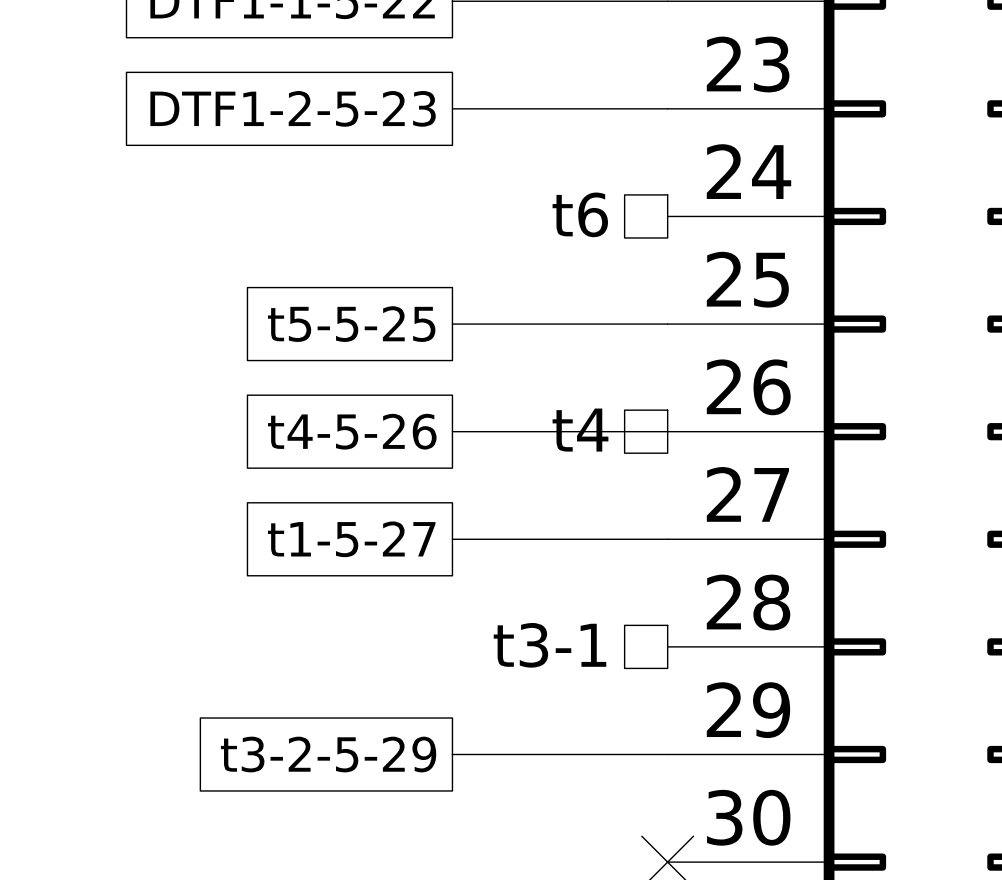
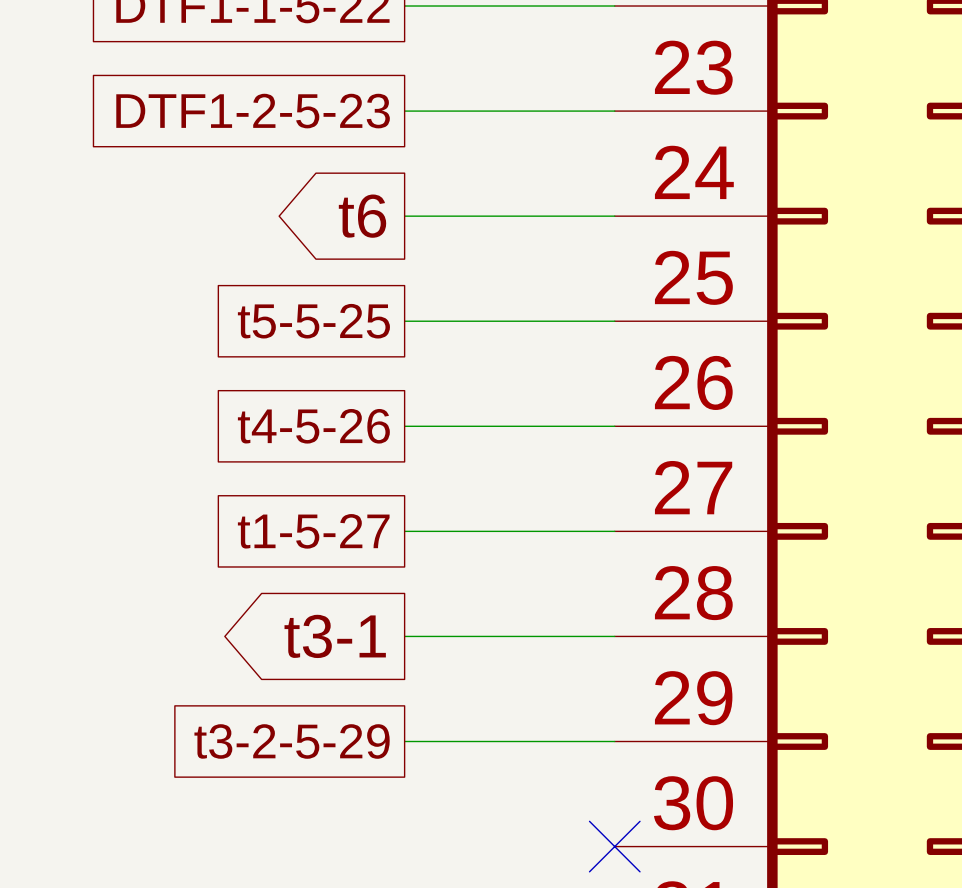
hierarchical label: t6 (580, 214) -> none
global label: none -> t6 (362, 216)
wire: none -> (404, 216) (614, 216)
hierarchical label: t4 (580, 430) -> none
hierarchical label: t3-1 (549, 645) -> none
global label: none -> t3-1 (335, 636)
wire: none -> (404, 636) (614, 636)

